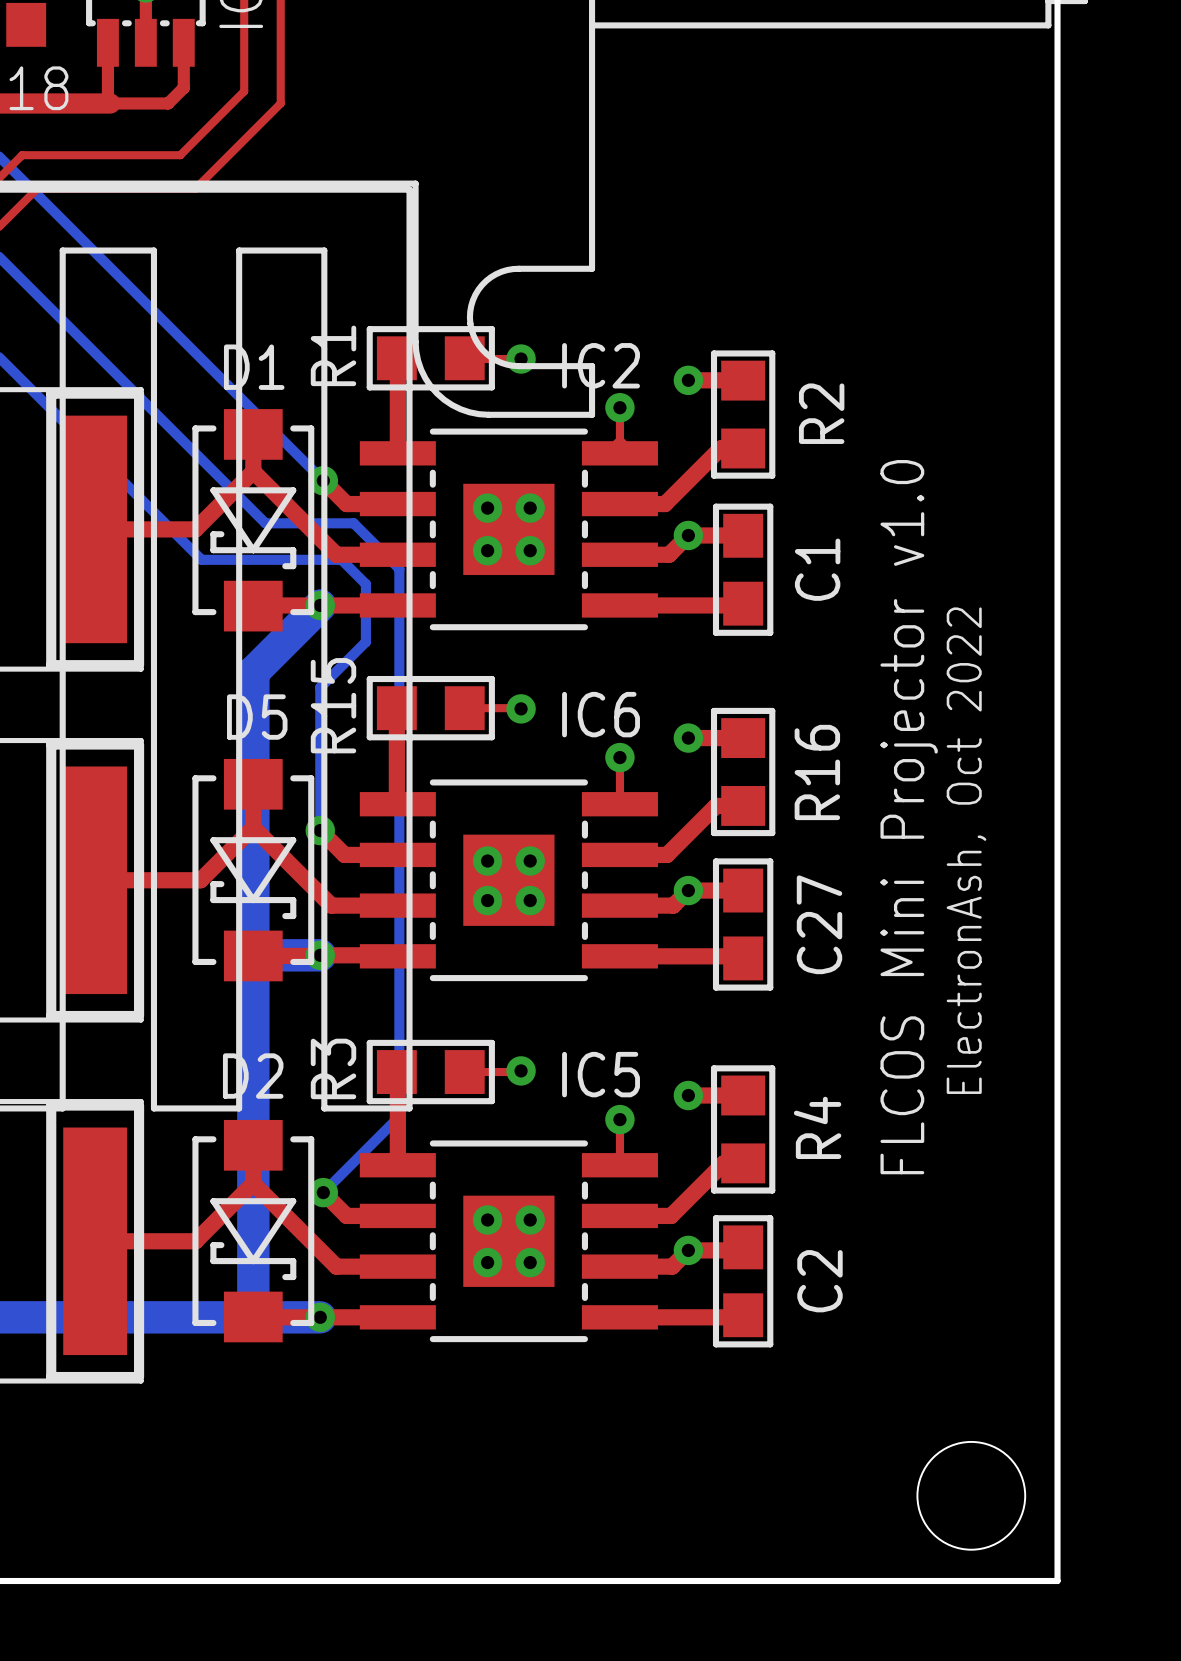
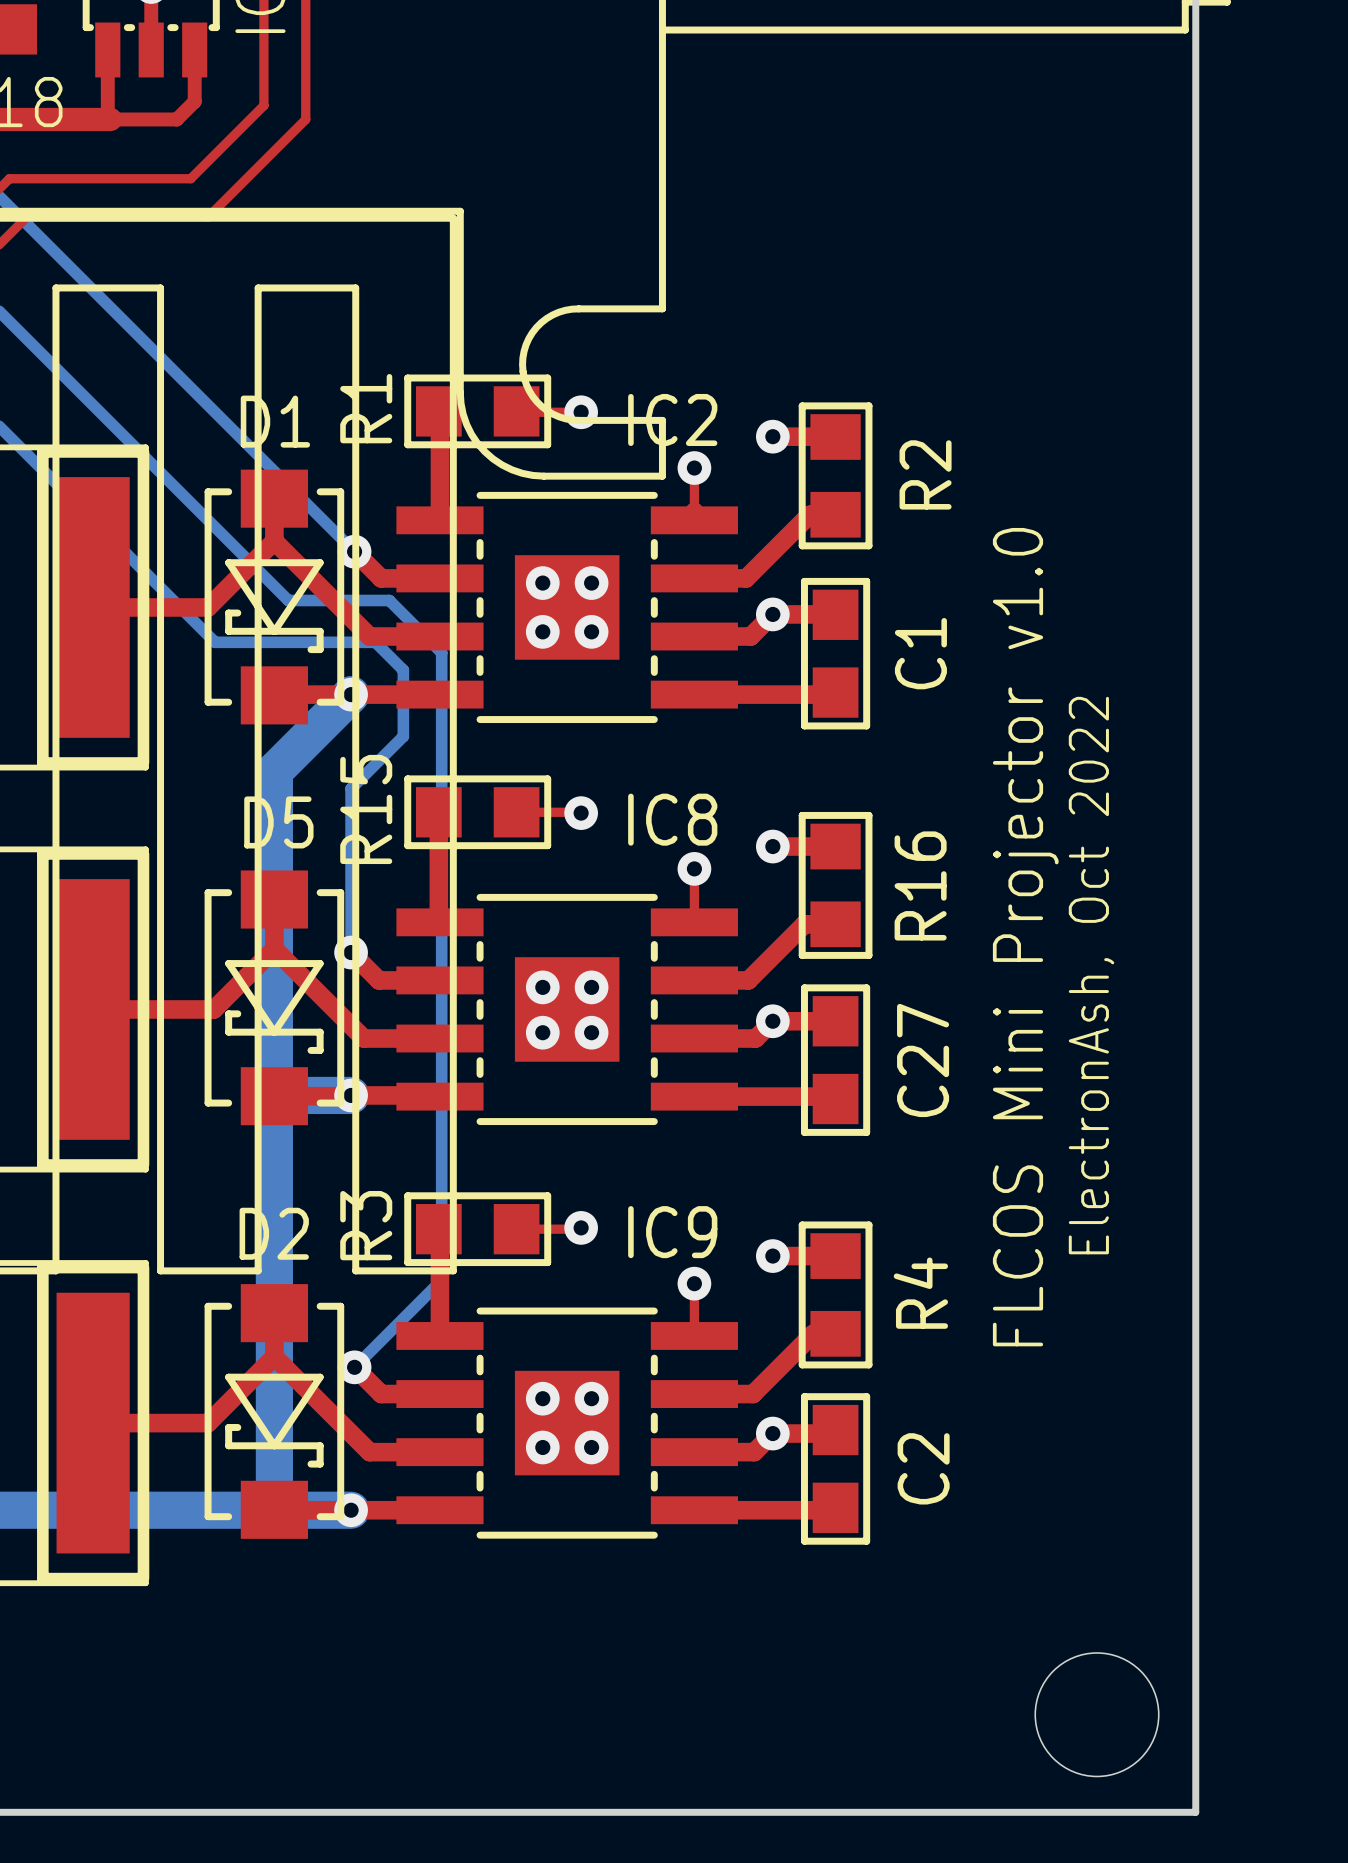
IC6 name: IC6 (601, 714) -> IC8 (672, 819)
IC5 name: IC5 (601, 1074) -> IC9 (672, 1232)

